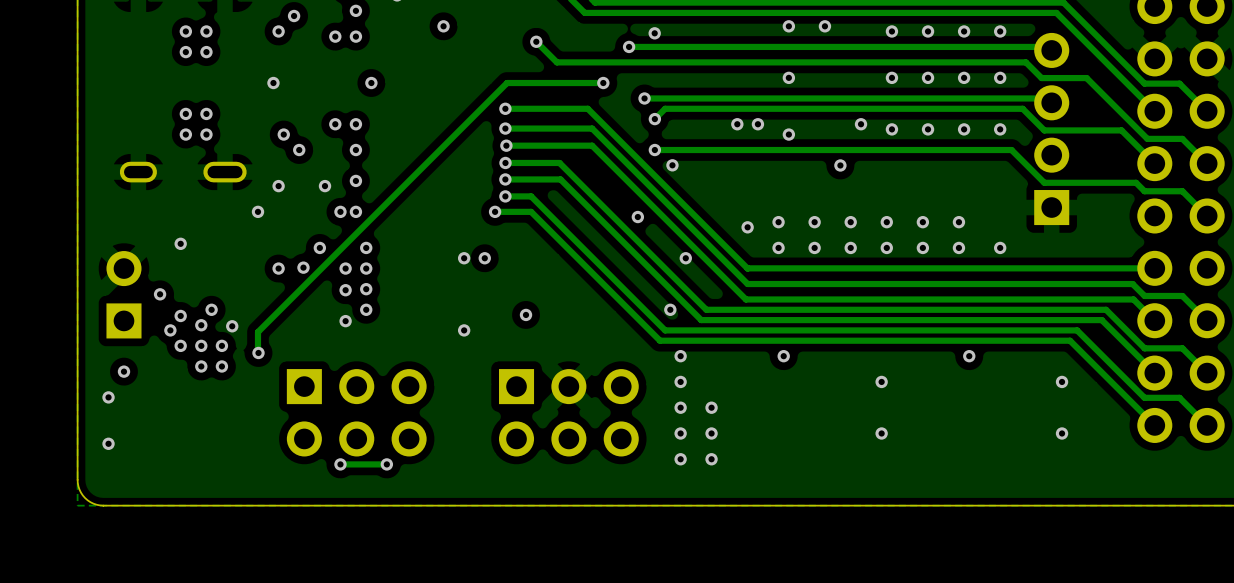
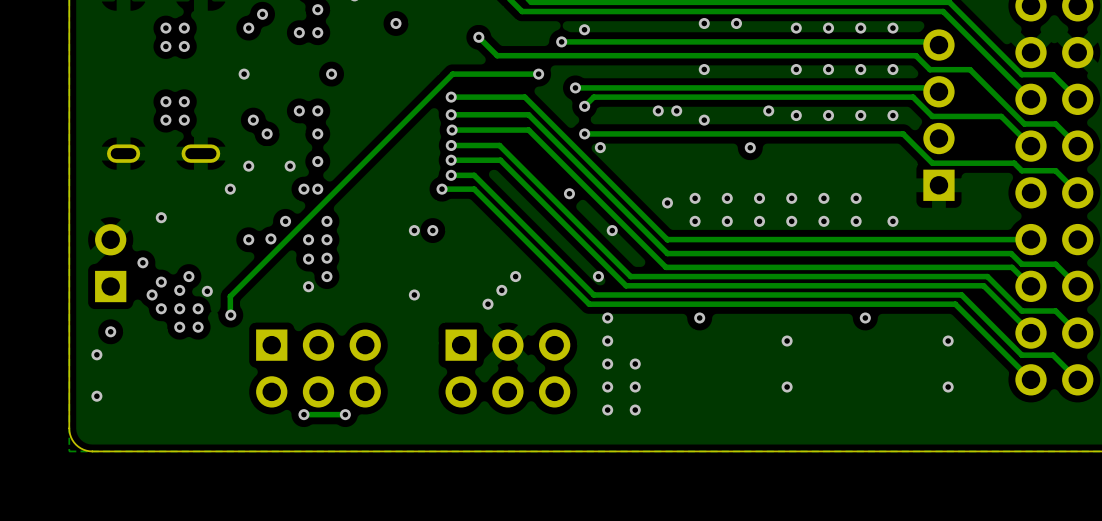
via: none -> (515, 276)
via: (526, 314) -> none
via: none -> (501, 290)
via: none -> (488, 304)

